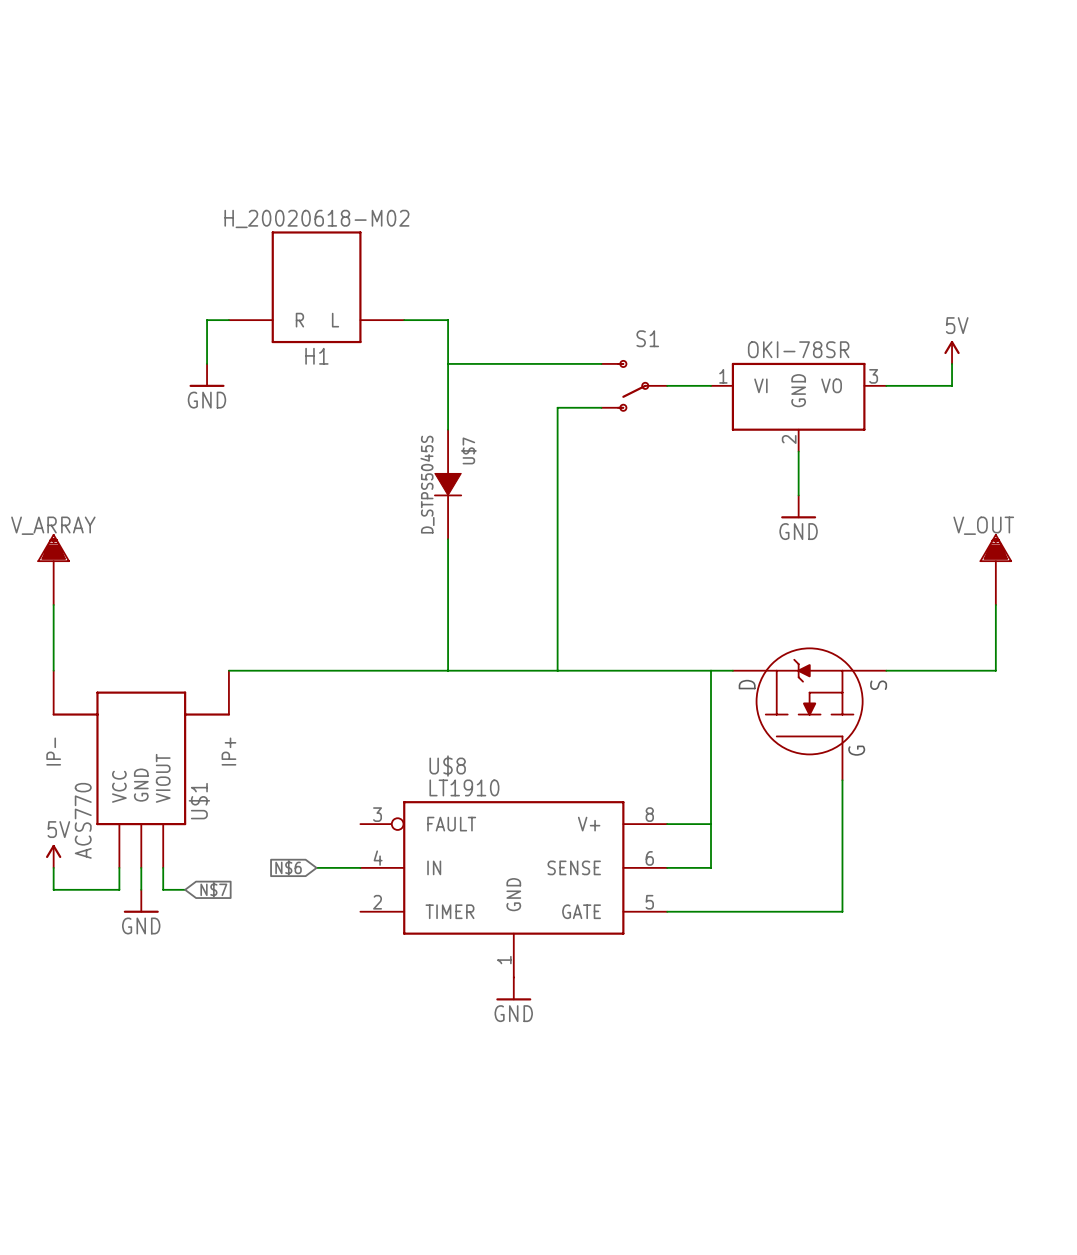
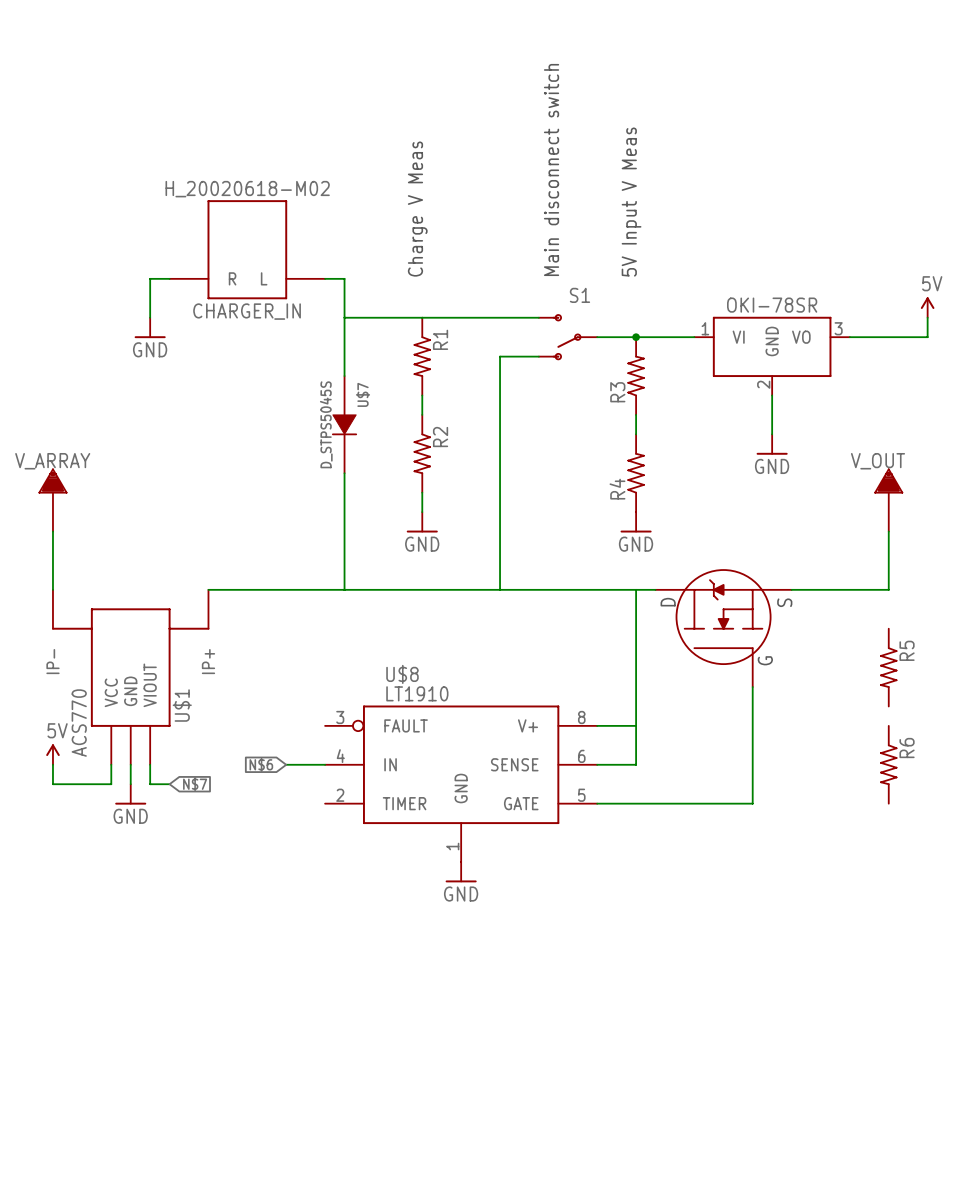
text: none -> Main disconnect switch (551, 169)
text: none -> 5V Input V Meas (631, 202)
text: none -> Charge V Meas (417, 209)
CHARGER_IN: none -> H_20020618-M02 (247, 249)
H1: H_20020618-M02 (316, 287) -> none
wire: (228, 320) (207, 320) (207, 363) -> (169, 278) (150, 278) (150, 317)
wire: none -> (325, 278) (344, 278) (344, 376)
wire: (404, 320) (448, 320) (448, 429) -> none
power symbol position: 5V (952, 352) -> 5V (927, 307)
wire: none -> (344, 317) (402, 317)
wire: (952, 363) (952, 385) (886, 385) -> none
wire: none -> (927, 317) (927, 337) (849, 337)
power symbol position: GND (207, 375) -> GND (150, 327)
wire: none -> (636, 337) (694, 337)
junction: none -> (636, 337)
R1: none -> (422, 356)
OKI-78SR position: (798, 407) -> (772, 356)
R3: none -> (636, 376)
wire: none -> (422, 395) (422, 414)
wire: (798, 451) (798, 495) -> (772, 395) (772, 434)
wire: none -> (636, 414) (636, 434)
U$7 position: (448, 484) -> (344, 424)
power symbol: GND (798, 506) -> none
power symbol: none -> GND (772, 444)
R2: none -> (422, 453)
wire: (448, 539) (448, 670) -> (344, 473) (344, 589)
R4: none -> (636, 473)
wire: none -> (422, 492) (422, 512)
power symbol: none -> GND (422, 522)
power symbol: none -> GND (636, 522)
R5: none -> (888, 667)
R6: none -> (888, 764)

